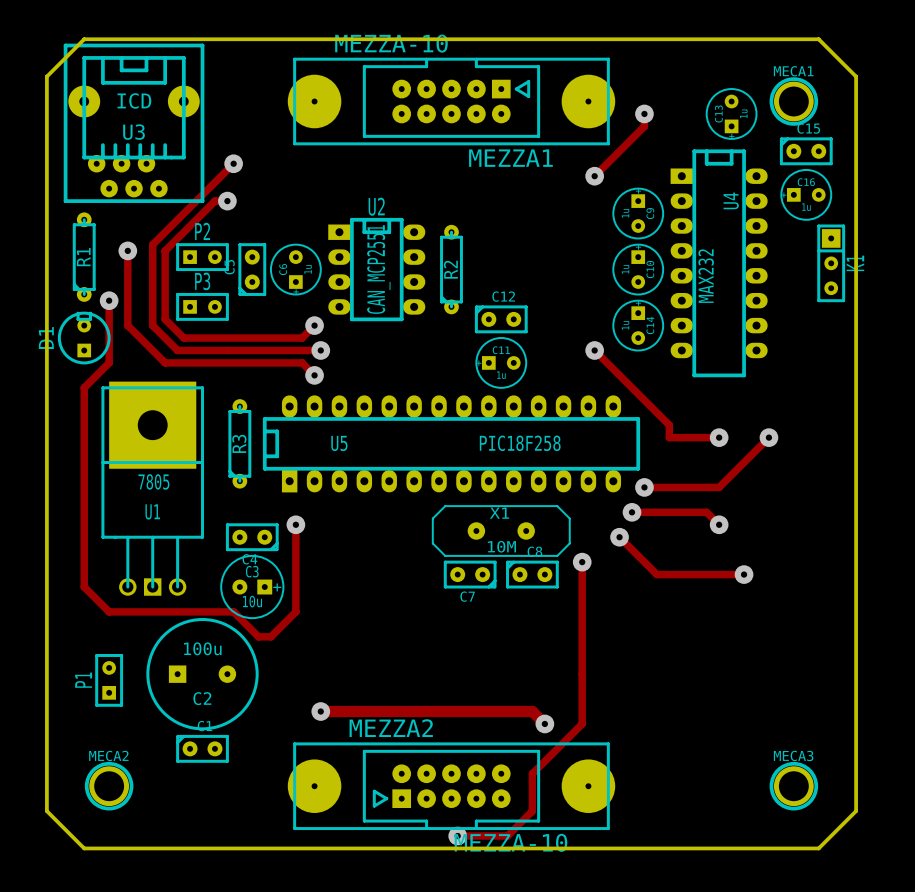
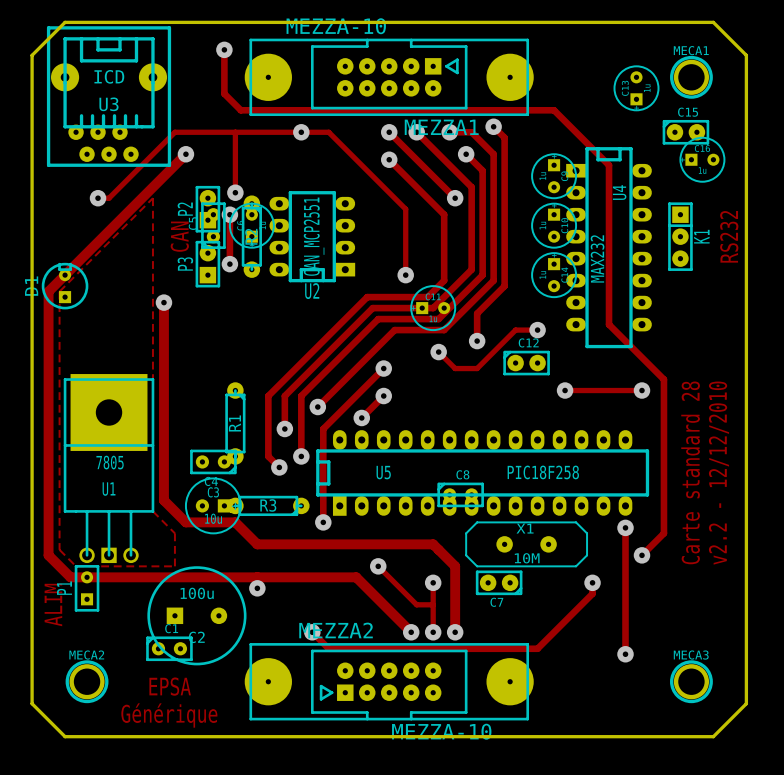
track: none -> (224, 49) (224, 93) (240, 110) (554, 110) (609, 165) (609, 324) (663, 379) (663, 533) (641, 555)
via: none -> (224, 49)
track: (644, 113) (644, 126) (594, 176) -> none
via: (644, 113) -> none
C15 footprint: [779, 137, 833, 166] -> [662, 119, 710, 145]
track: none -> (493, 126) (504, 137) (504, 286) (477, 313) (477, 341)
via: none -> (493, 126)
track: (233, 163) (152, 244) (152, 325) (177, 350) (320, 350) -> none
via: (233, 163) -> none
track: none -> (235, 132) (235, 192)
via: none -> (301, 132)
track: none -> (389, 132) (455, 198)
via: none -> (389, 132)
track: none -> (416, 132) (471, 187) (471, 269) (433, 308) (372, 308) (284, 396) (284, 428)
via: none -> (416, 132)
track: none -> (449, 132) (471, 132) (493, 154) (493, 280) (444, 330) (394, 330) (317, 407)
via: none -> (449, 132)
via: (594, 176) -> none
track: none -> (185, 154) (48, 291) (48, 555) (70, 577) (356, 577) (411, 632)
via: none -> (185, 154)
track: none -> (466, 154) (482, 170) (482, 275) (438, 319) (378, 319) (301, 396) (301, 456)
via: none -> (466, 154)
track: none -> (389, 159) (444, 214) (444, 280) (427, 297) (367, 297) (268, 396) (268, 456) (279, 467)
via: none -> (389, 159)
track: (227, 201) (214, 201) (165, 250) (165, 319) (183, 338) (302, 338) (314, 325) -> none
via: (227, 201) -> none
R1 footprint: [72, 212, 96, 302] -> [225, 382, 246, 465]
R2 footprint: [440, 224, 463, 315] -> [241, 195, 262, 278]
K1 footprint: [817, 224, 846, 303] -> [668, 202, 693, 271]
P2 name position: P2 (202, 231) -> P2 (185, 209)
via: none -> (235, 192)
track: none -> (98, 198) (109, 198) (174, 132) (328, 132) (405, 209) (405, 275)
zone outline: none -> (152, 198) (152, 511) (174, 533) (174, 566) (76, 566) (59, 549) (59, 291) (152, 198)
via: none -> (455, 198)
P2 footprint: [176, 243, 229, 272] -> [195, 185, 221, 233]
track: (127, 250) (127, 325) (165, 362) (302, 362) (314, 375) -> none
via position: (127, 250) -> (98, 198)
track: none -> (229, 214) (229, 264)
via: none -> (229, 214)
U4 position: (719, 263) -> (609, 247)
U2 rotation: 0° (376, 269) -> 180° (312, 236)
P3 name position: P3 (202, 281) -> P3 (185, 264)
text: none -> CAN (179, 236)
text: none -> RS232 (729, 236)
P3 footprint: [176, 292, 229, 321] -> [195, 240, 221, 288]
track: (109, 300) (109, 362) (84, 387) (84, 587) (109, 611) (233, 611) (258, 636) (270, 636) (295, 611) (295, 524) -> none
via: (109, 300) -> none
C12 footprint: [474, 305, 528, 334] -> [503, 350, 550, 376]
via: none -> (229, 264)
via: (314, 325) -> none
via: none -> (405, 275)
via: (320, 350) -> none
track: (594, 350) (669, 425) (669, 437) (719, 437) -> none
via: (594, 350) -> none
track: none -> (163, 302) (163, 500) (185, 522) (235, 522) (257, 544) (433, 544) (455, 566) (455, 632)
via: none -> (163, 302)
via: (314, 375) -> none
track: none -> (537, 330) (515, 330) (477, 368) (455, 368) (438, 352)
via: none -> (537, 330)
R3 footprint: [228, 399, 252, 489] -> [227, 495, 310, 517]
via: none -> (477, 341)
via: none -> (438, 352)
track: none -> (383, 368) (323, 428) (323, 522)
via: none -> (383, 368)
via: (719, 437) -> none
track: (768, 437) (719, 487) (644, 487) -> none
via: (768, 437) -> none
U5 position: (451, 443) -> (482, 472)
track: none -> (565, 390) (641, 390)
via: none -> (565, 390)
via: none -> (641, 390)
track: none -> (383, 396) (361, 417)
via: none -> (383, 396)
via: none -> (317, 407)
via: none -> (361, 417)
via: (644, 487) -> none
U1 position: (152, 488) -> (109, 468)
via: none -> (284, 428)
X1 footprint: [432, 505, 571, 557] -> [465, 521, 588, 568]
track: (632, 512) (706, 512) (719, 524) -> none
via: (632, 512) -> none
via: (295, 524) -> none
via: (719, 524) -> none
via: none -> (301, 456)
track: (619, 537) (656, 574) (744, 574) -> none
via: (619, 537) -> none
via: none -> (279, 467)
text: none -> Carte standard 28 (690, 472)
text: none -> v2.2 - 12/12/2010 (718, 473)
C7 footprint: [443, 560, 497, 589] -> [475, 570, 523, 596]
track: (582, 562) (582, 723) (532, 773) (532, 811) (507, 836) (457, 836) -> none
via: (582, 562) -> none
via: (744, 574) -> none
via: none -> (323, 522)
track: none -> (625, 527) (625, 654)
via: none -> (625, 527)
C2 footprint: [146, 618, 259, 731] -> [147, 566, 247, 666]
via: none -> (641, 555)
track: none -> (378, 566) (416, 604) (433, 604)
via: none -> (378, 566)
track: none -> (433, 582) (433, 604)
via: none -> (433, 582)
track: none -> (592, 582) (592, 593) (537, 648) (328, 648) (312, 632)
via: none -> (592, 582)
via: none -> (257, 588)
text: none -> ALIM (53, 605)
track: none -> (433, 604) (433, 632)
track: (320, 711) (532, 711) (544, 723) -> none
via: (320, 711) -> none
via position: (544, 723) -> (455, 632)
via: none -> (312, 632)
via: none -> (411, 632)
via: none -> (433, 632)
via: none -> (625, 654)
text: none -> EPSA (170, 686)
text: none -> Générique (169, 715)
via: (457, 836) -> none

